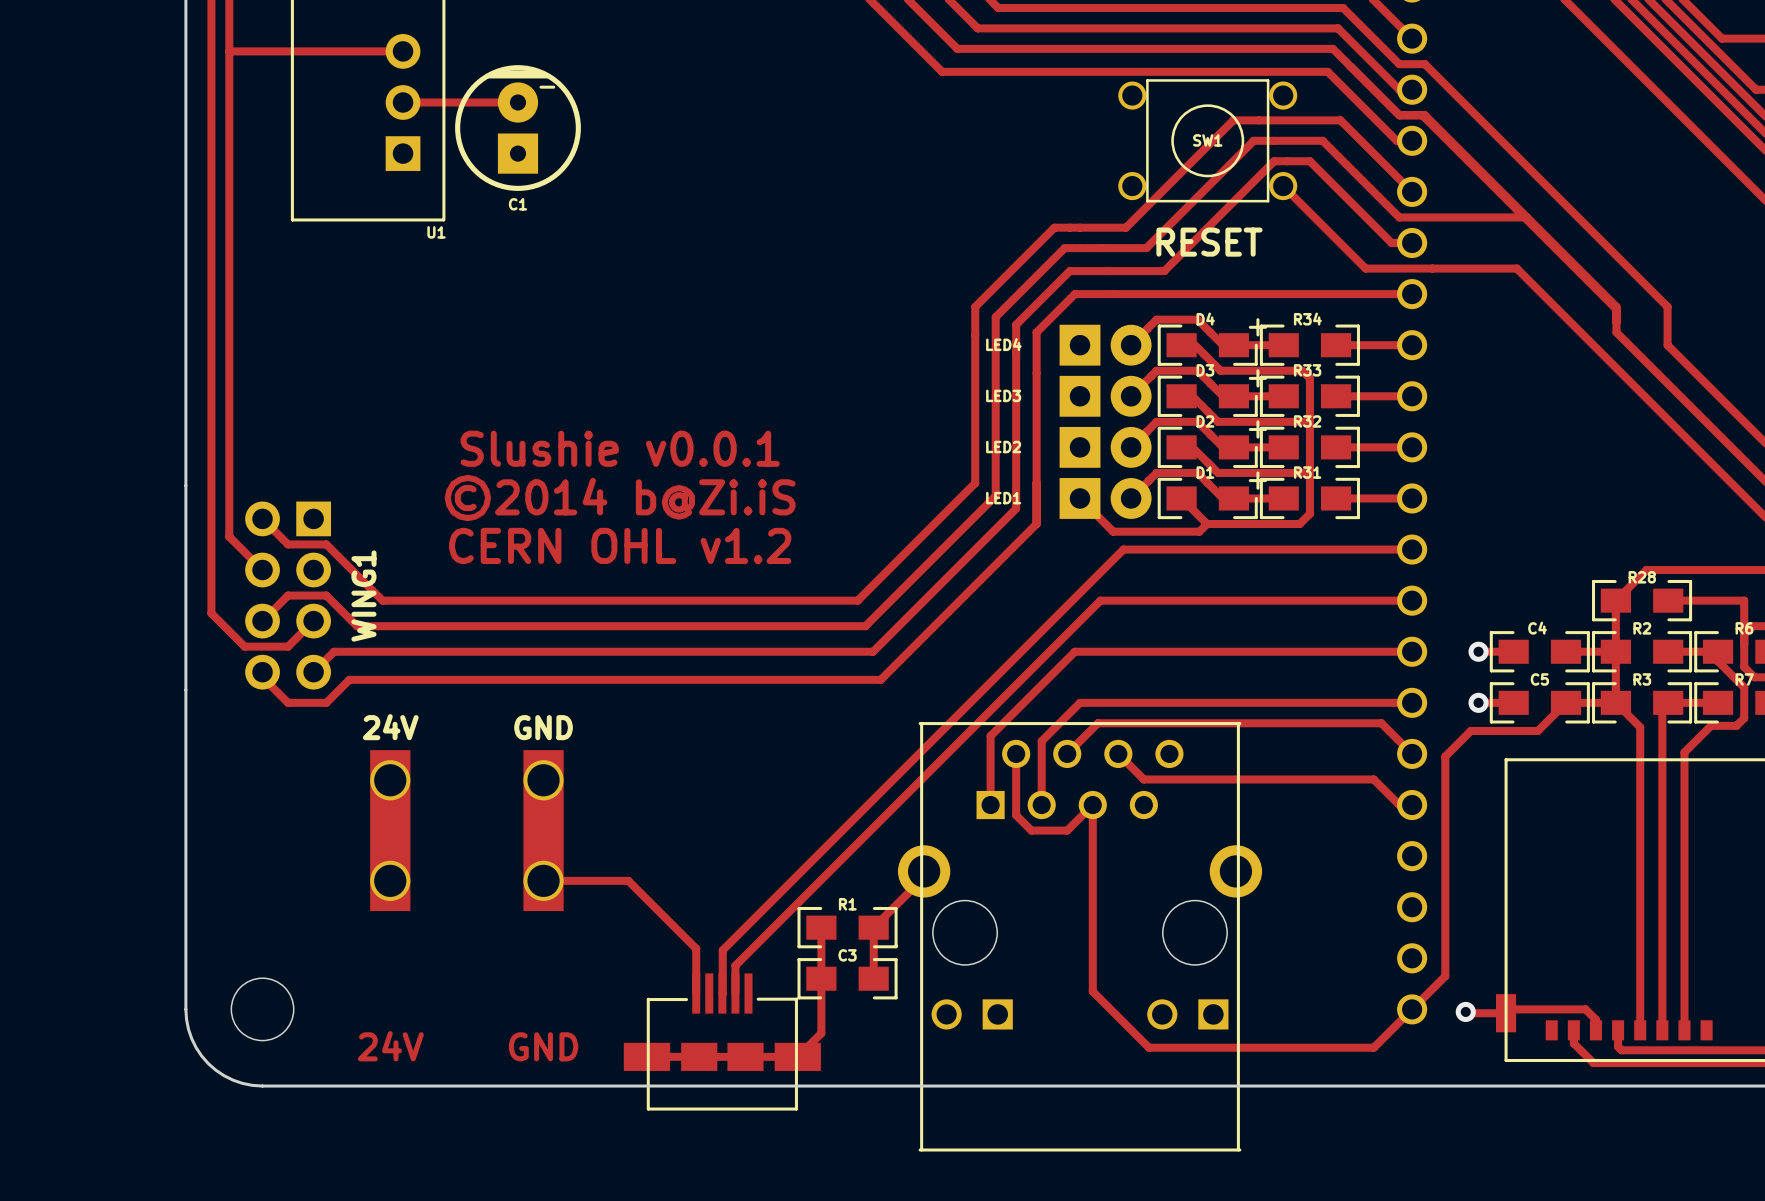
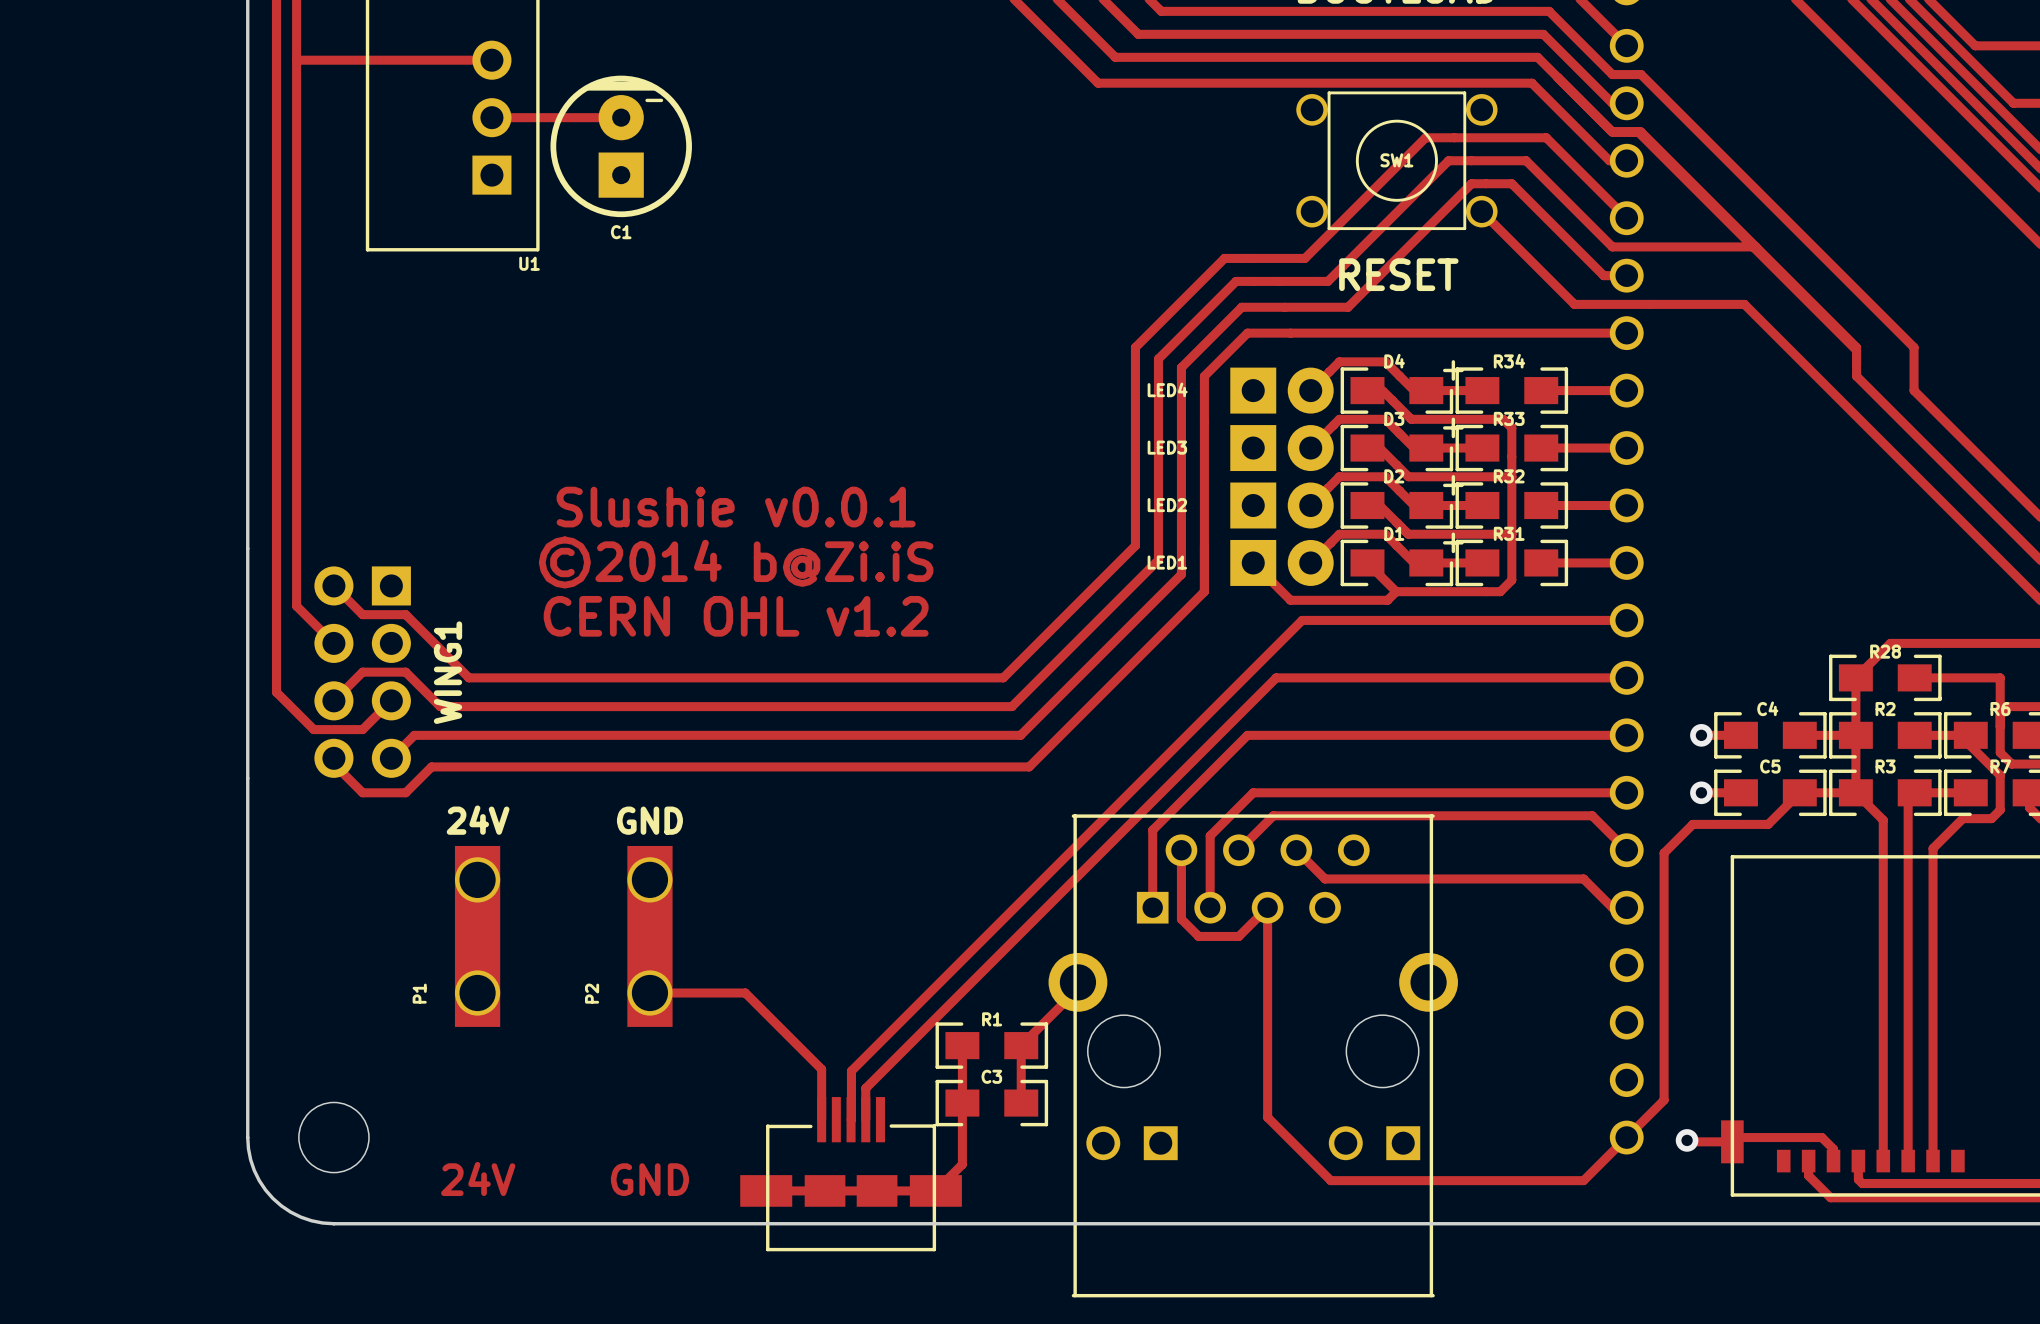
P1 name: none -> P1 (419, 993)
P2 name: none -> P2 (592, 993)

